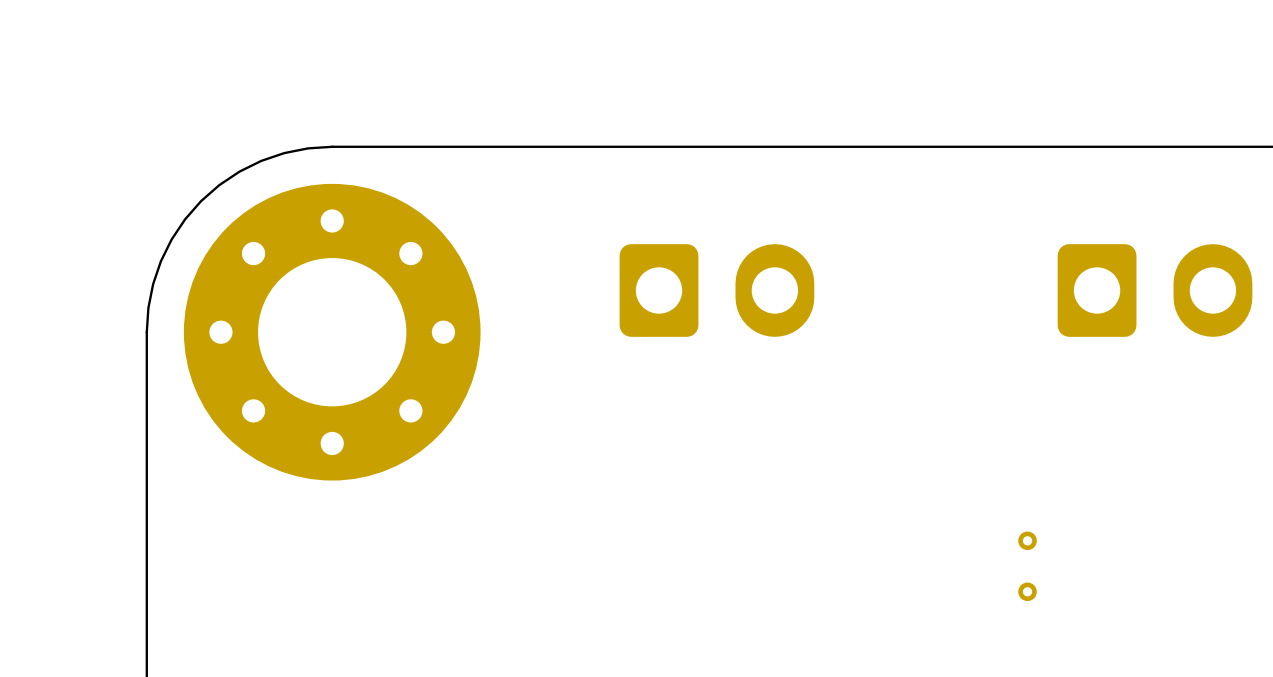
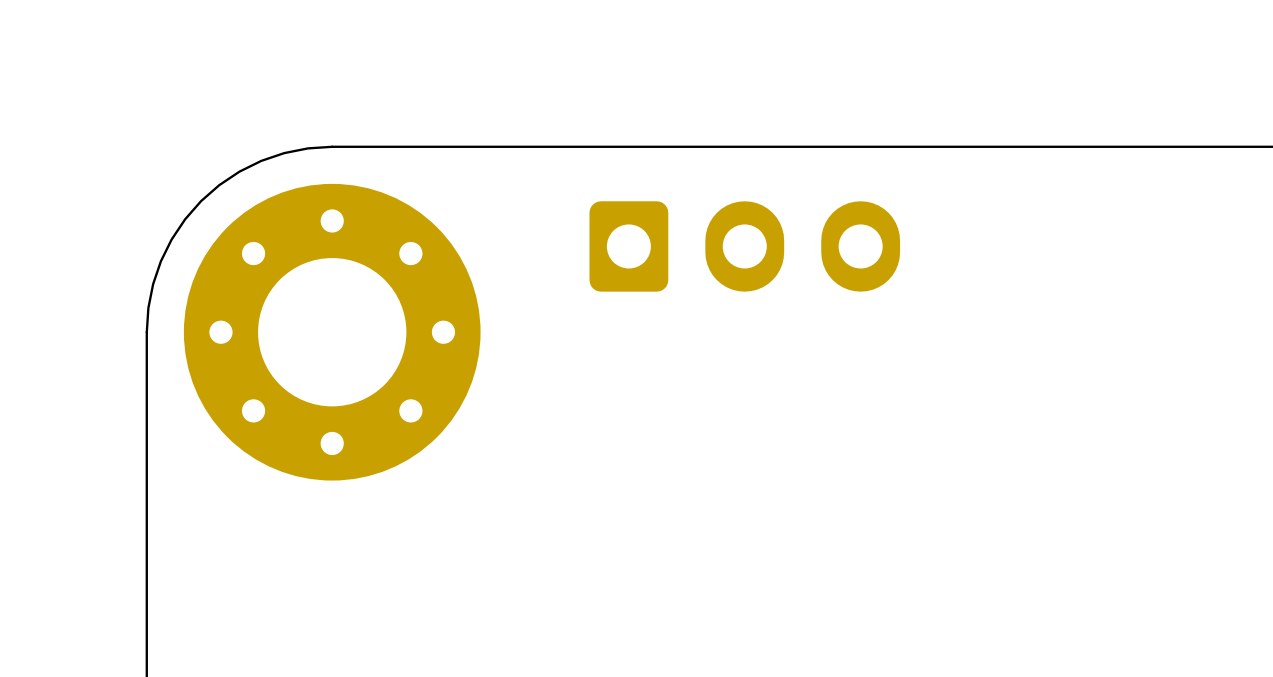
part: none -> (744, 246)
part: (716, 290) -> none
part: (1155, 290) -> none
part: (1027, 566) -> none

